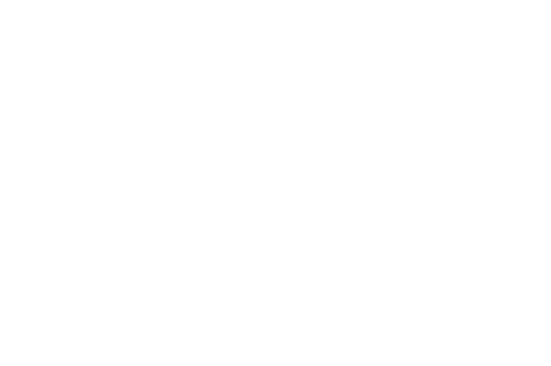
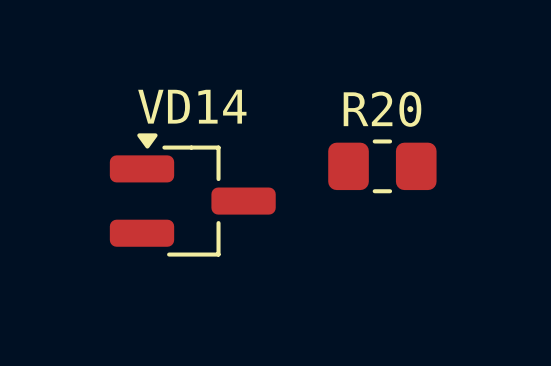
R20: none -> (382, 166)
VD14: none -> (192, 194)

